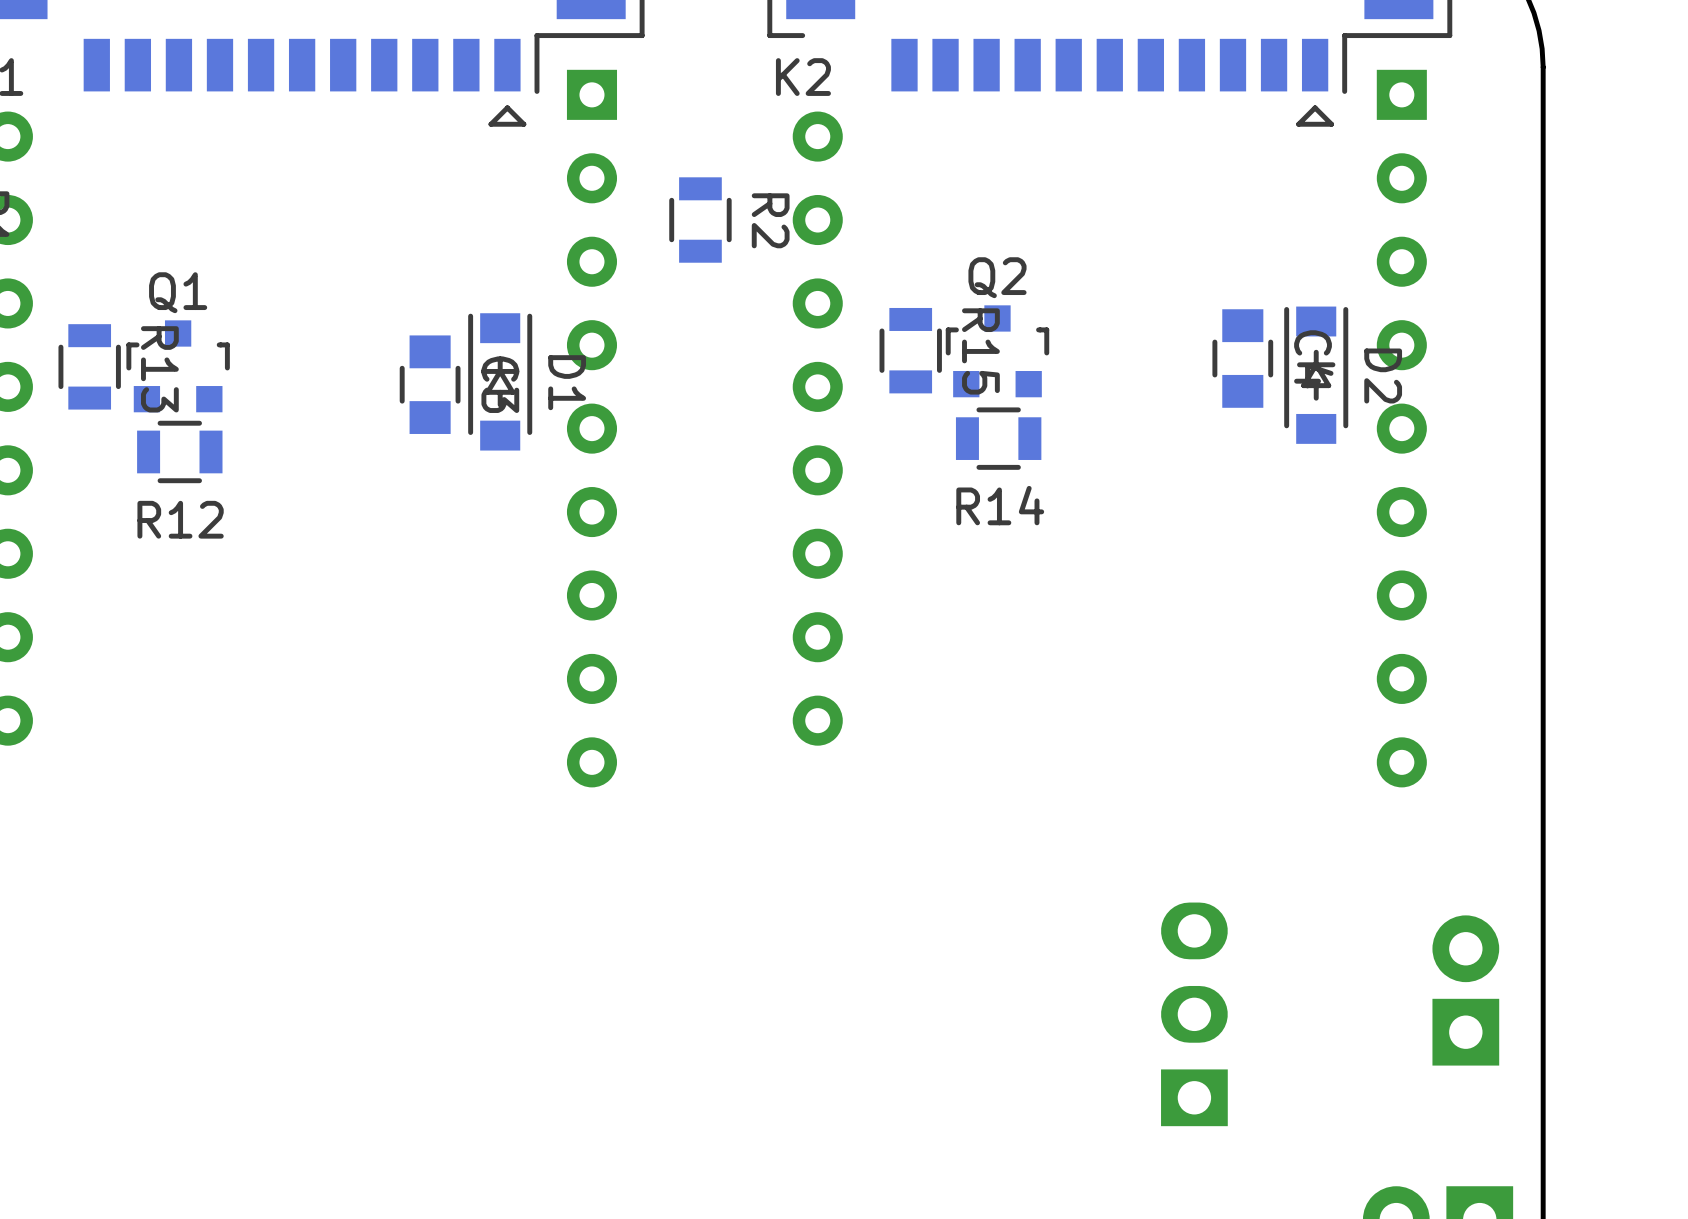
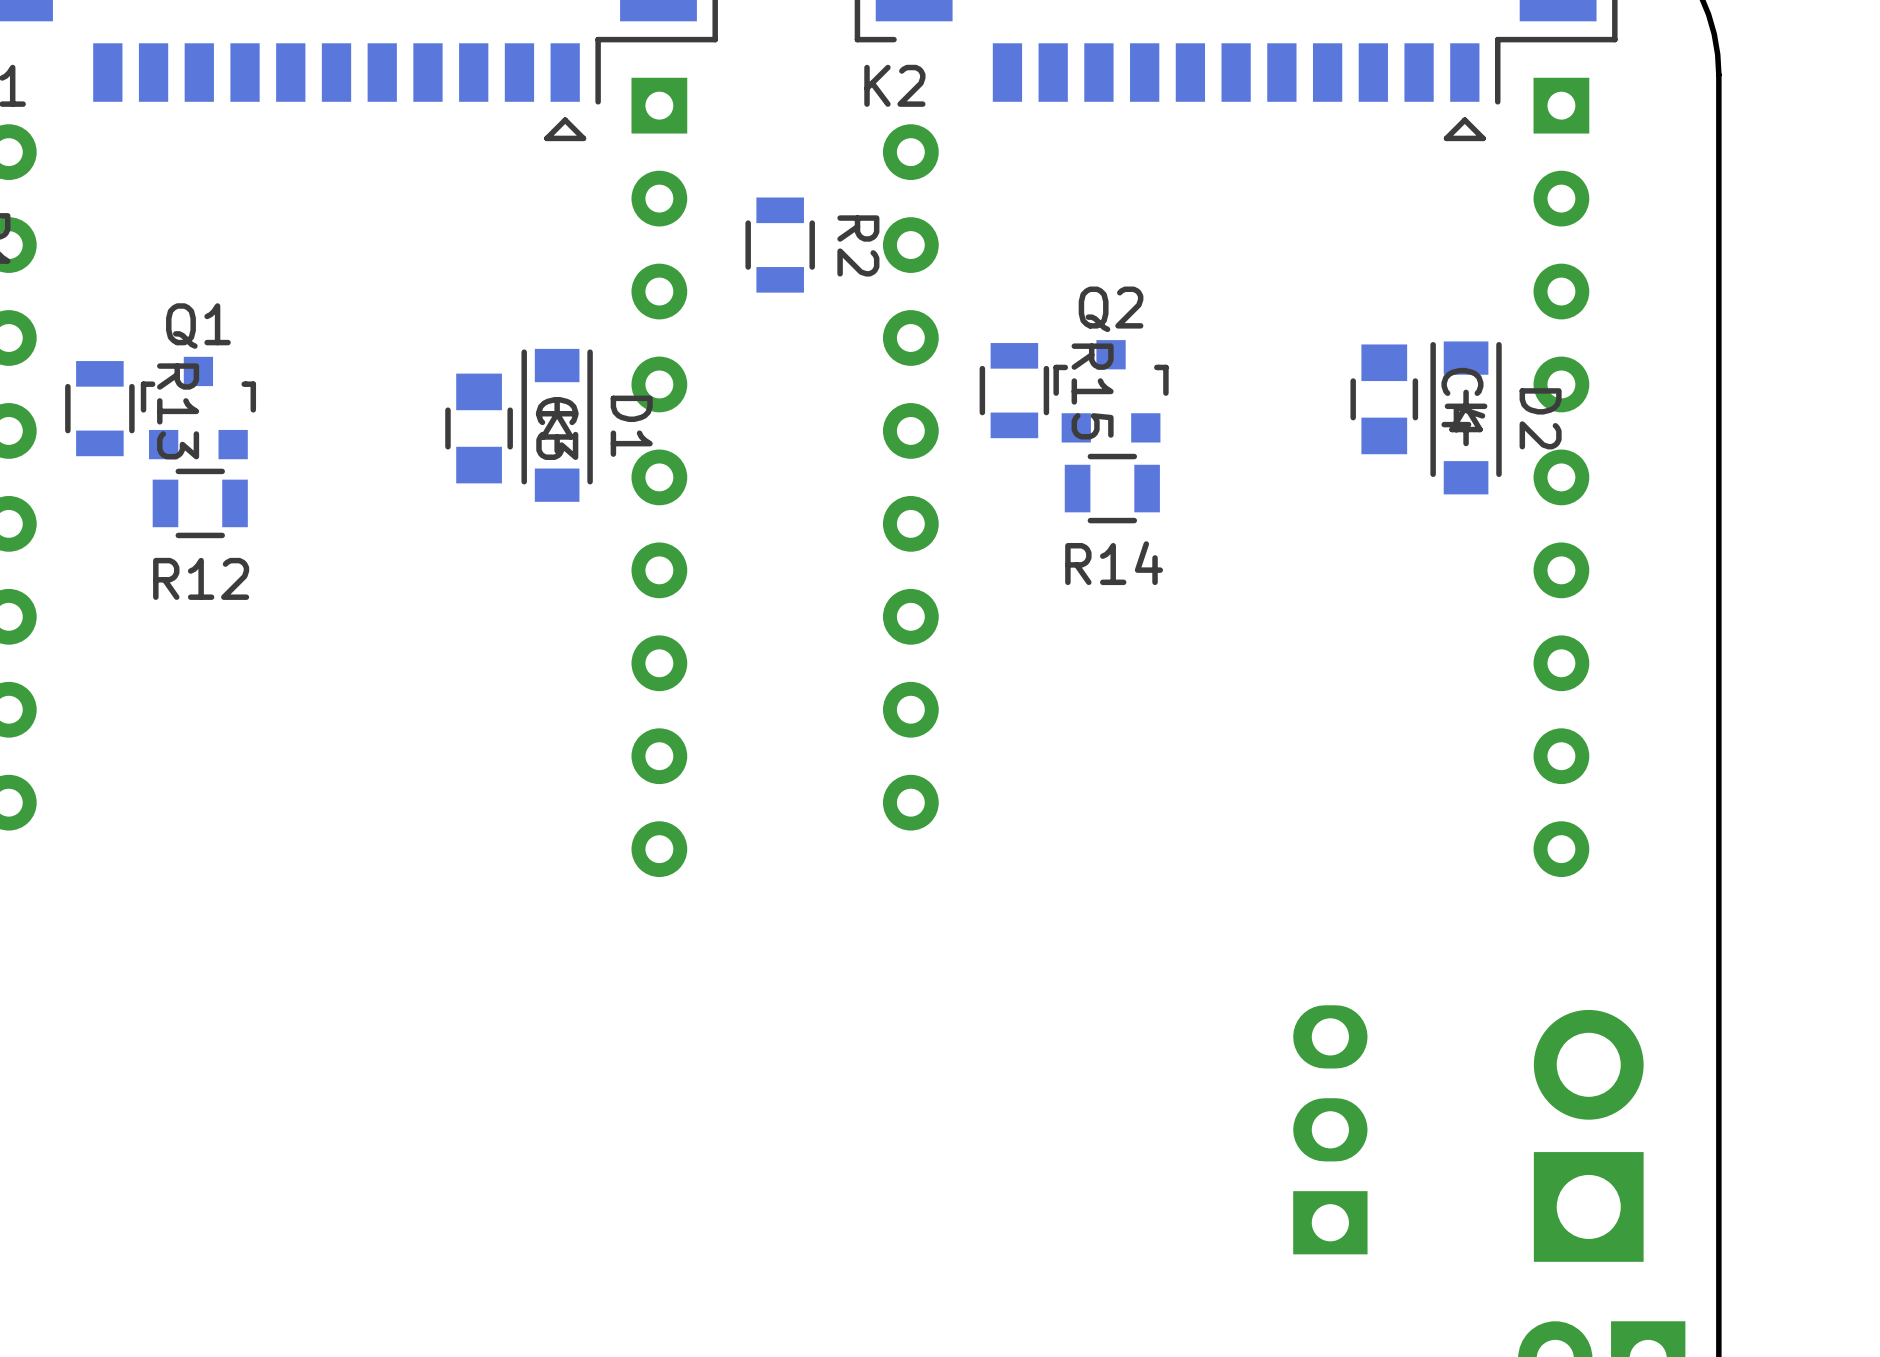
part: (1465, 990) -> none
part: none -> (1588, 1135)

